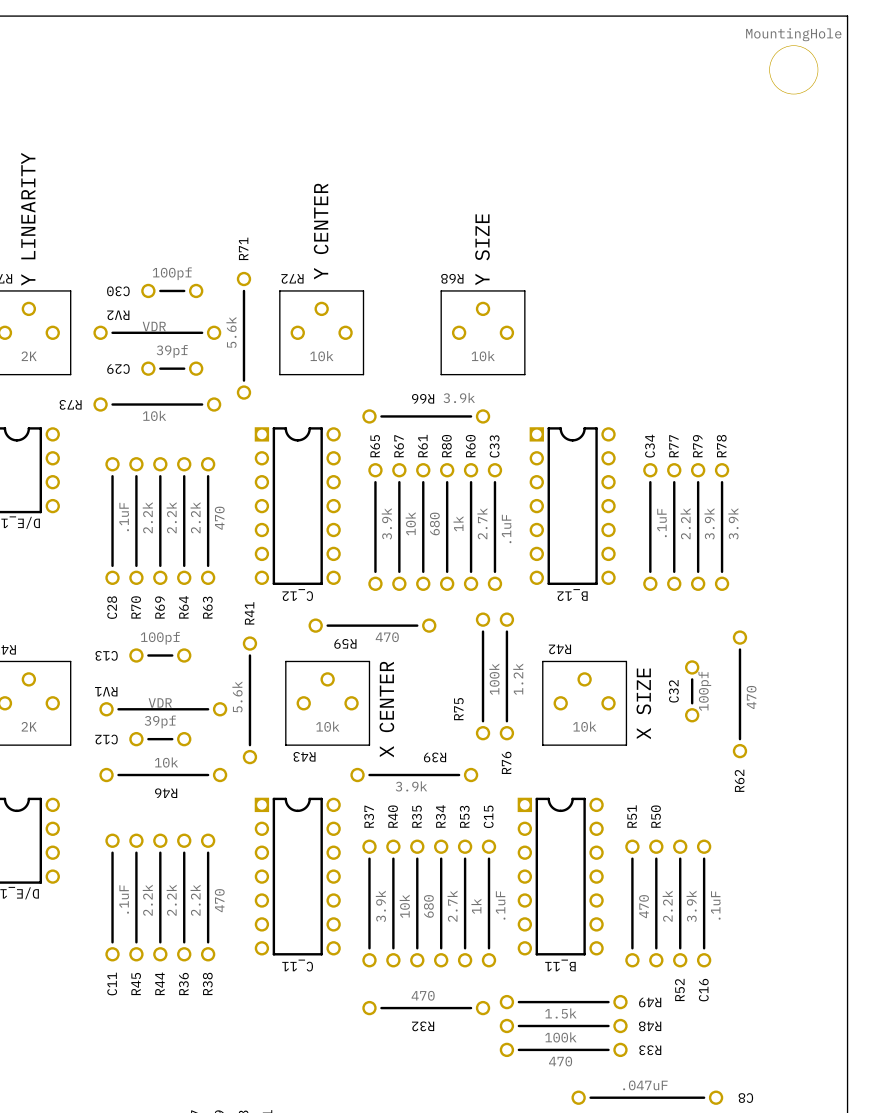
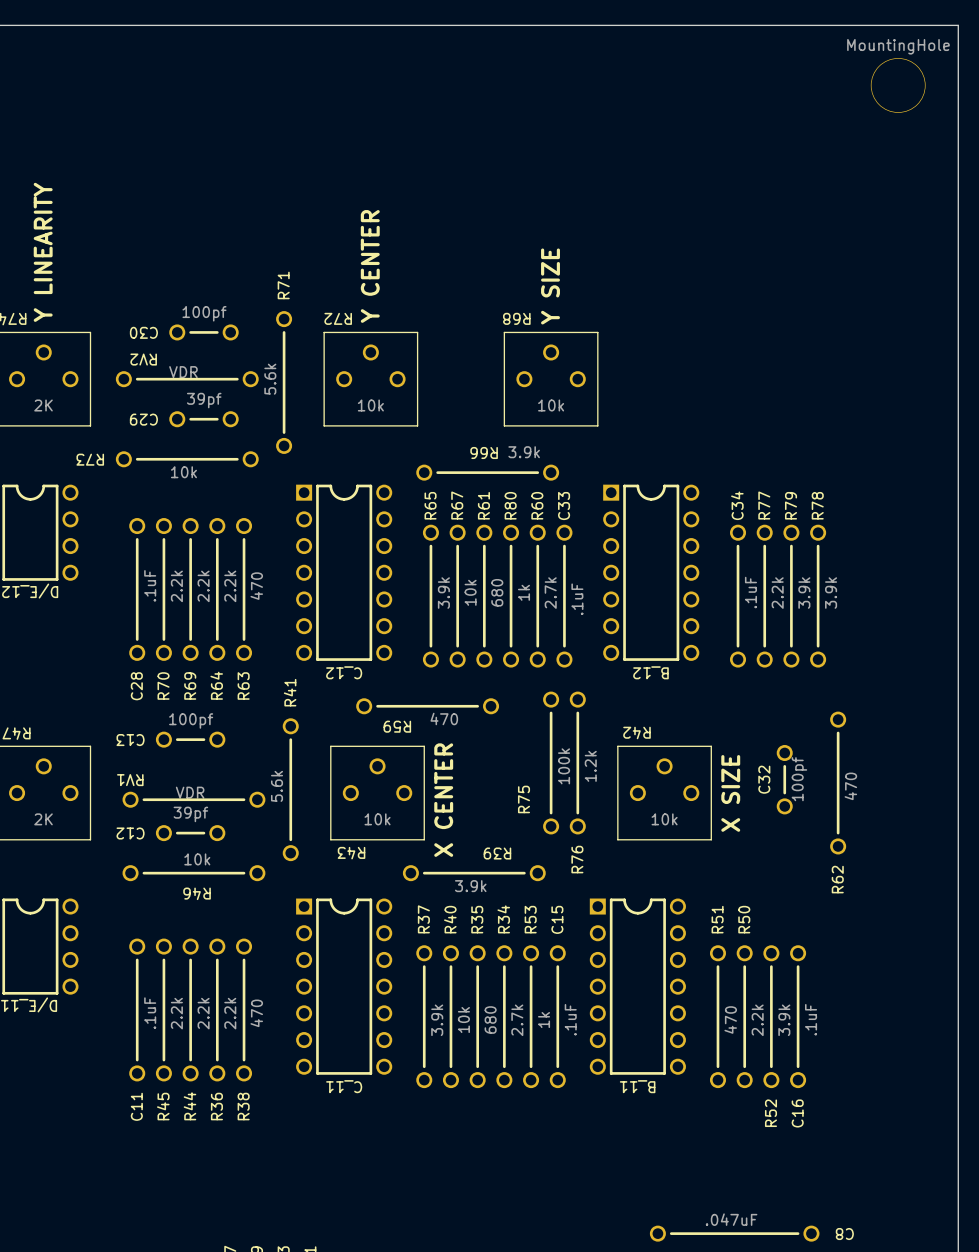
R49: 1.5k (563, 1002) -> none
R32: 470 (426, 1008) -> none
R48: 100k (563, 1026) -> none
R33: 470 (563, 1049) -> none

